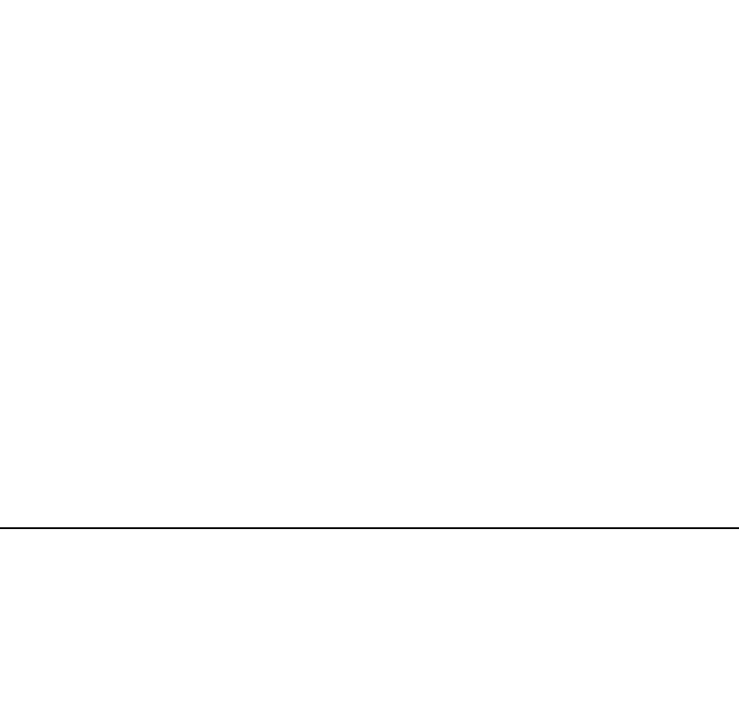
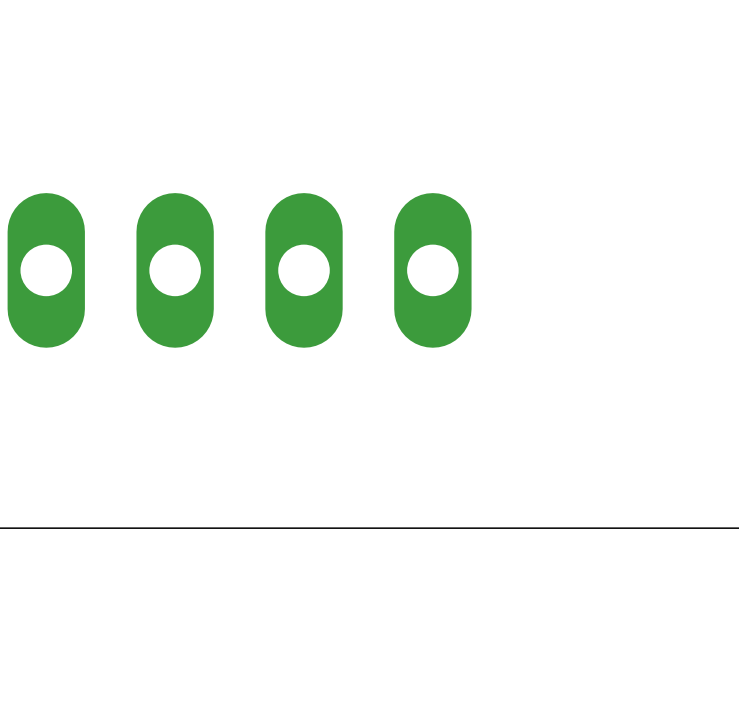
part: none -> (239, 270)

